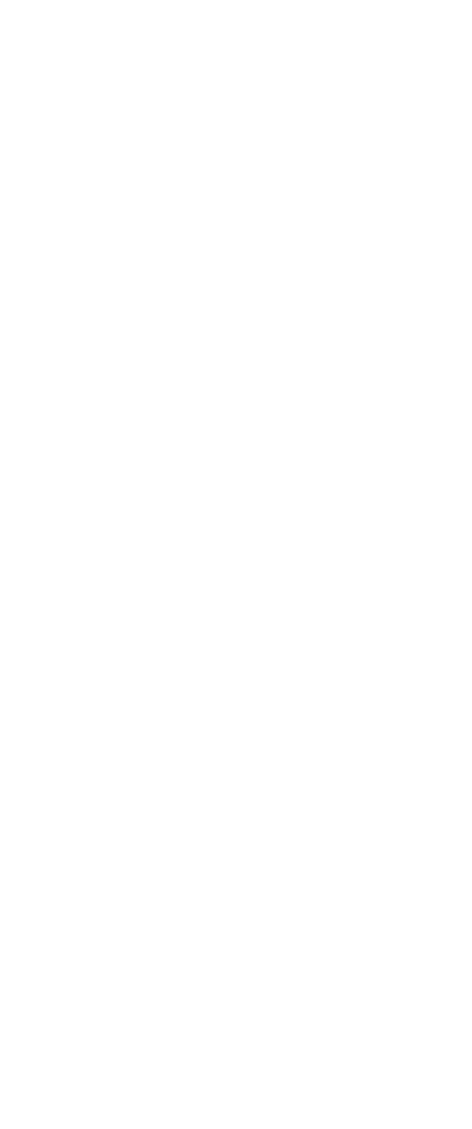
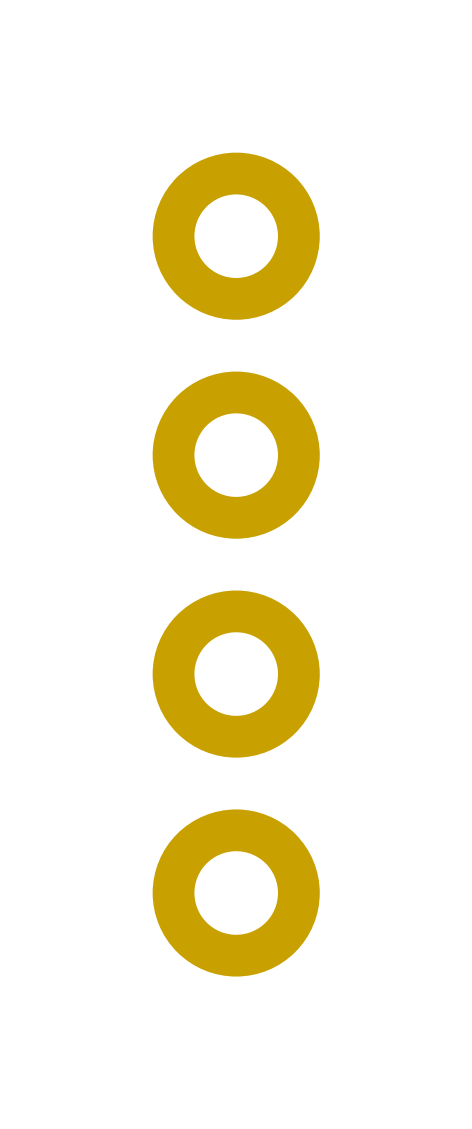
part: none -> (236, 236)
part: none -> (236, 455)
part: none -> (236, 674)
part: none -> (236, 892)

